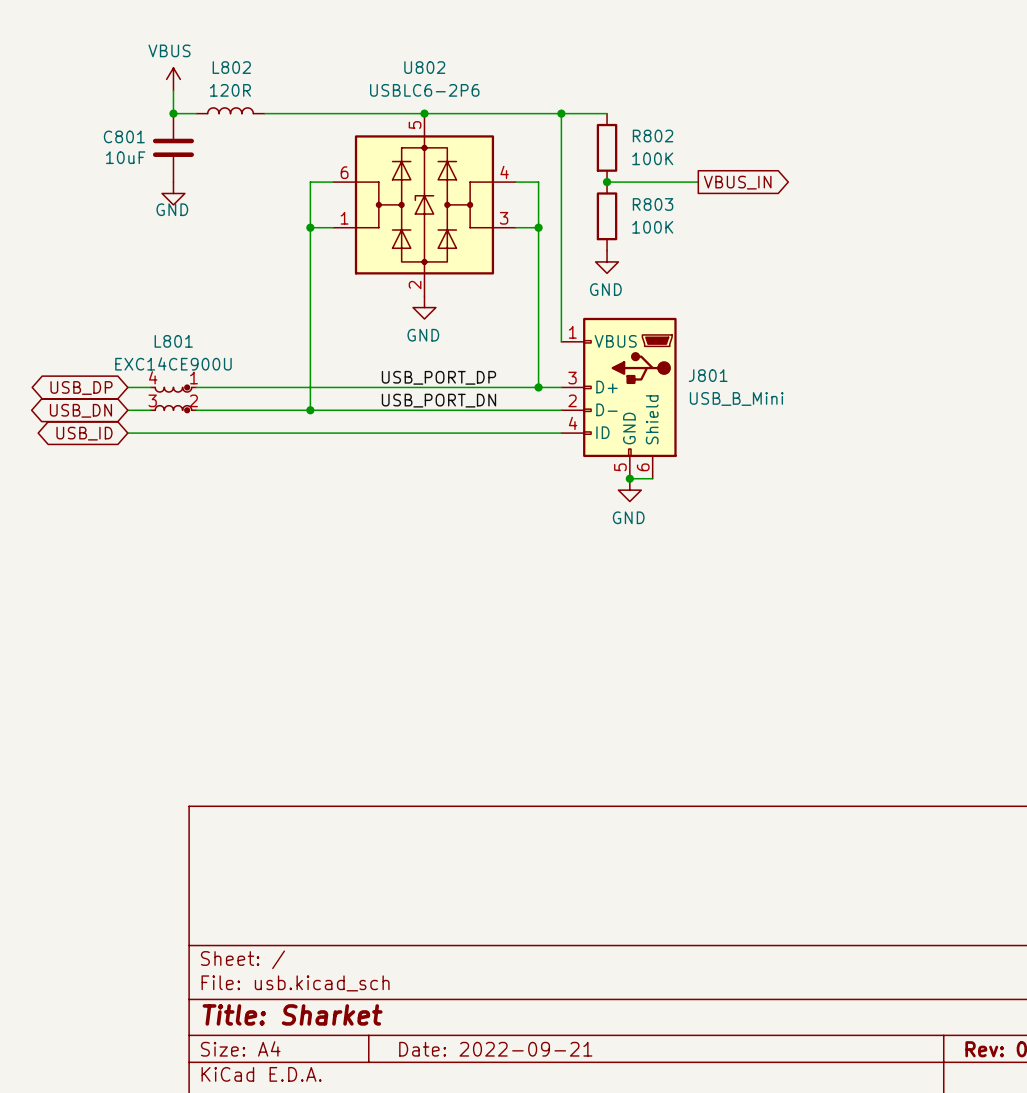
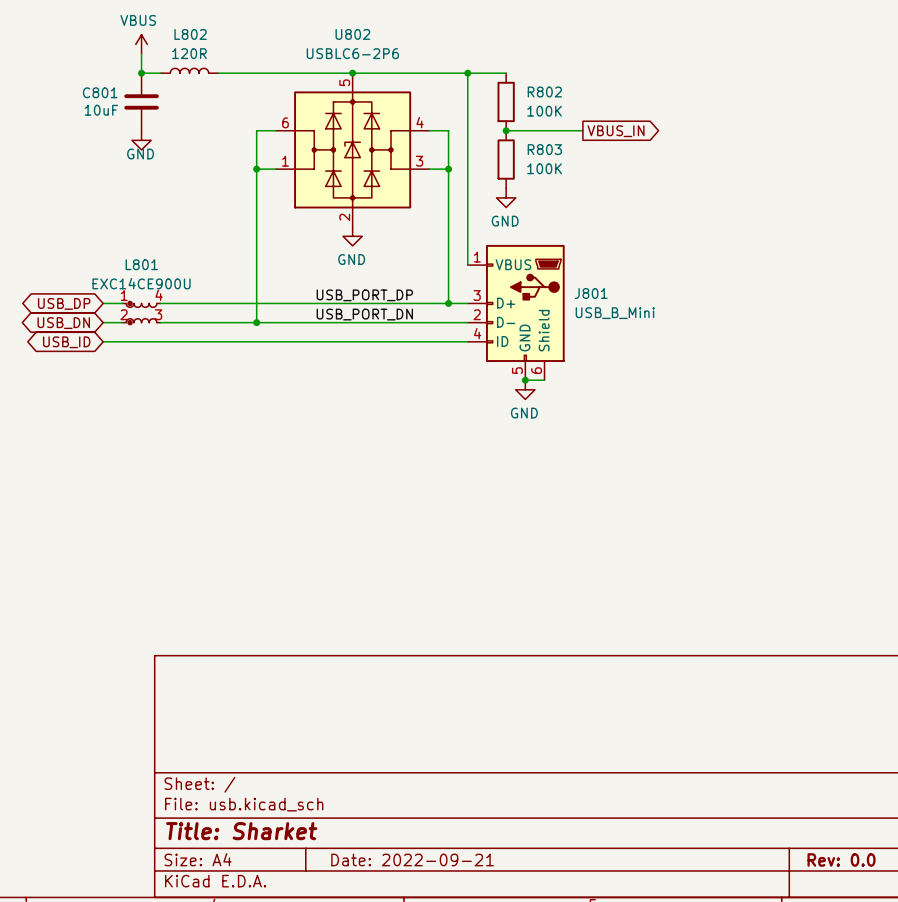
L801 flip: as is (173, 398) -> left-right (141, 313)

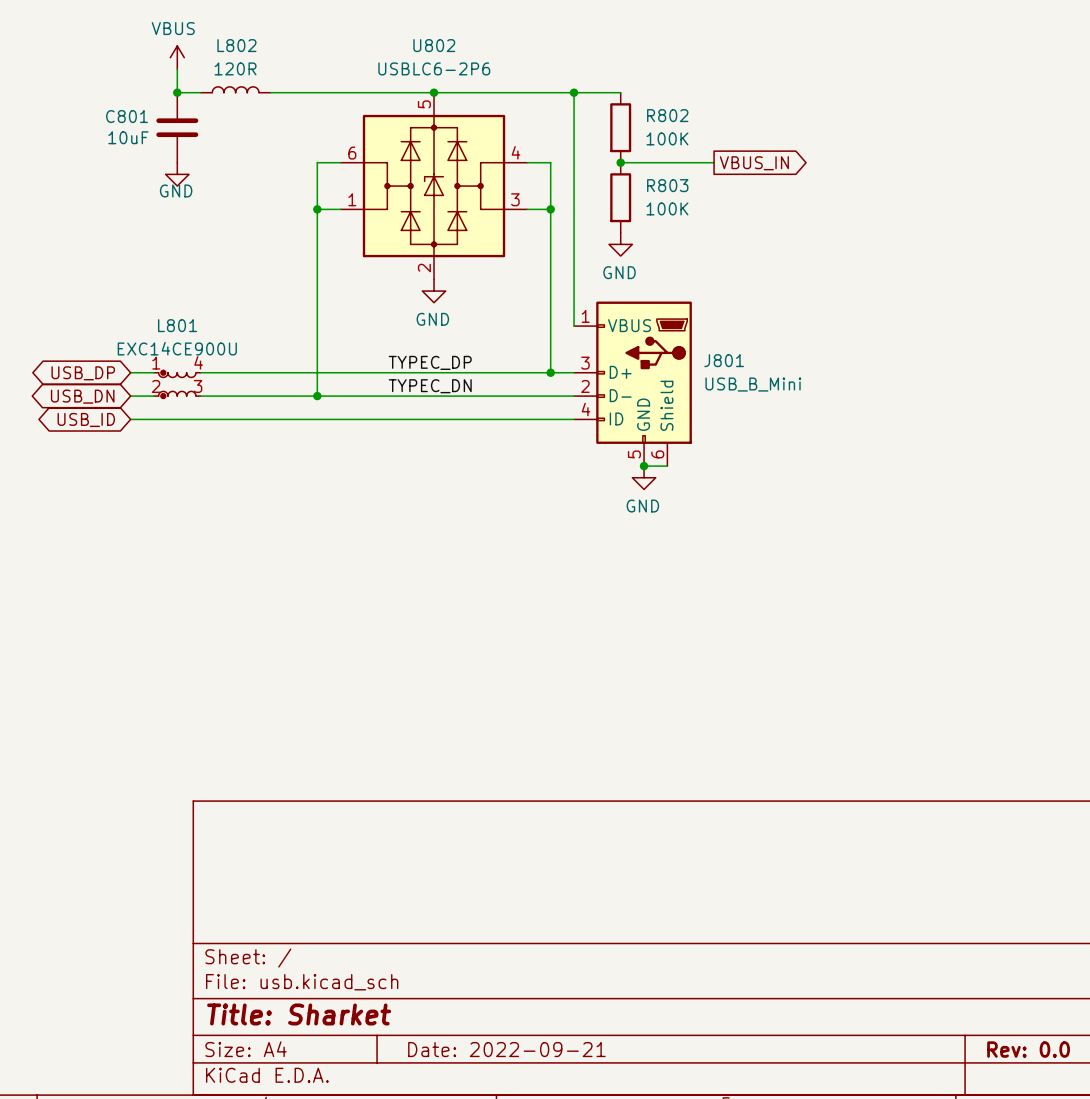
label: USB_PORT_DP (364, 295) -> TYPEC_DP (430, 362)
label: USB_PORT_DN (364, 314) -> TYPEC_DN (430, 386)

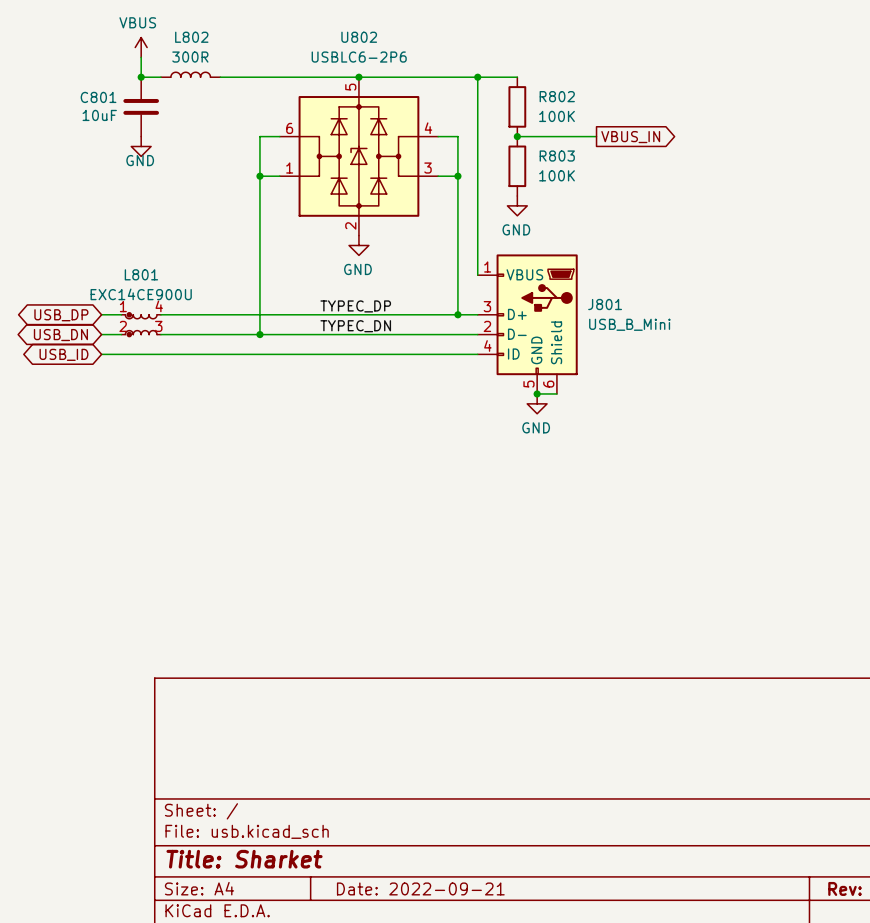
L802 value: 120R (235, 68) -> 300R (190, 57)

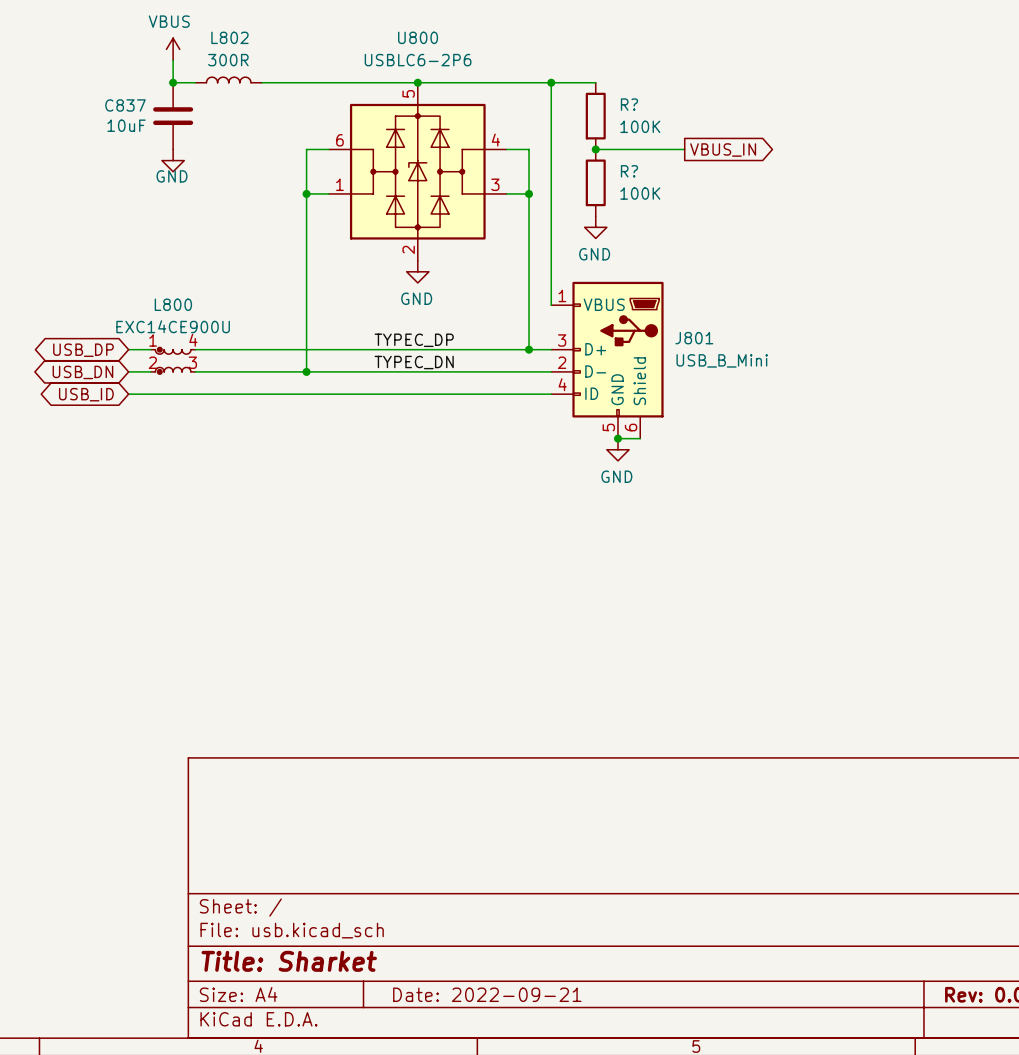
U802 name: U802 (359, 37) -> U800 (418, 37)
R802 name: R802 (557, 96) -> R? (629, 104)
C801 name: C801 (98, 97) -> C837 (125, 105)
R803 name: R803 (557, 156) -> R? (629, 171)
L801 name: L801 (141, 274) -> L800 (173, 304)

